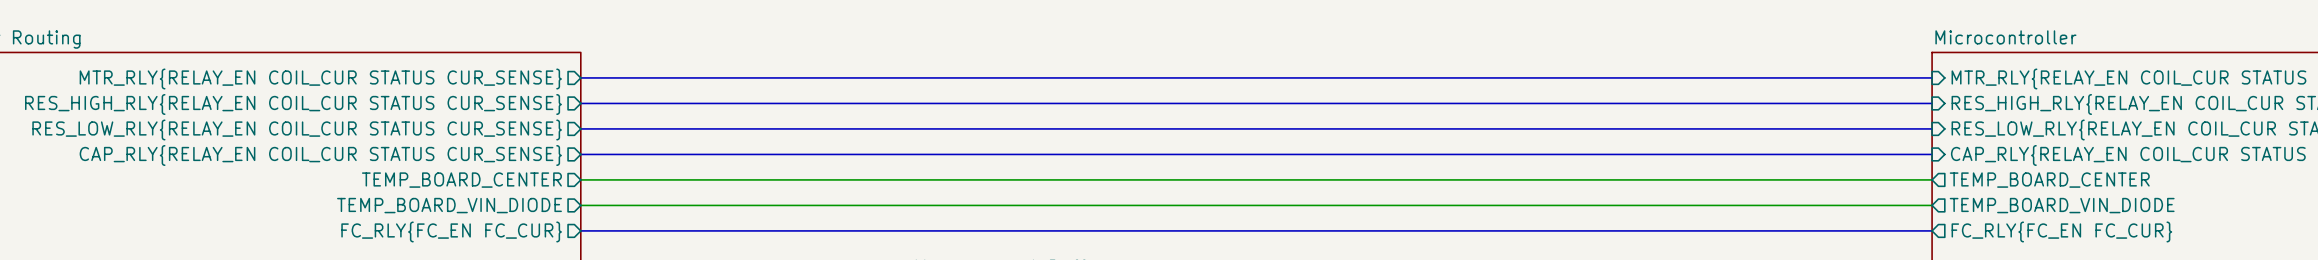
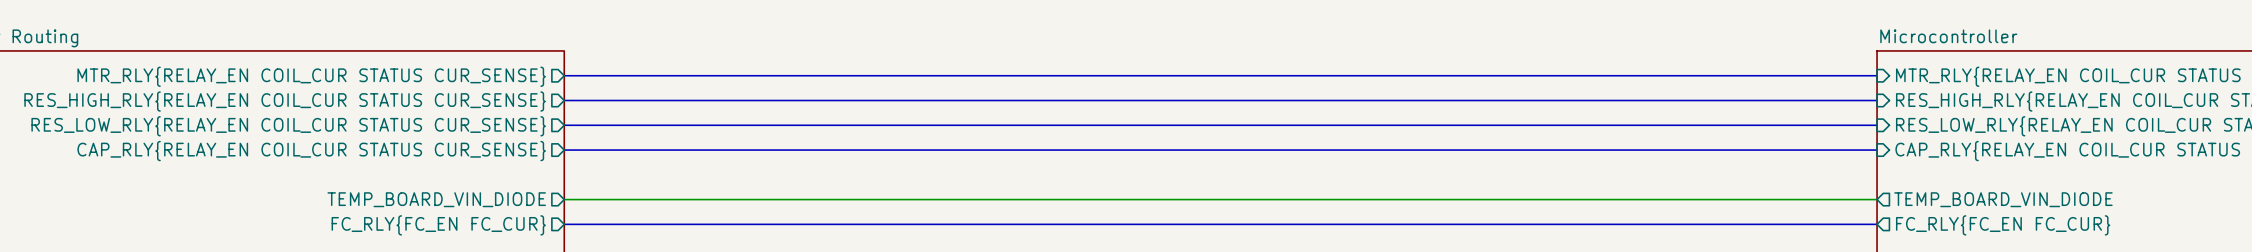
wire: (580, 179) (1932, 179) -> none
sheet pin: TEMP_BOARD_CENTER (461, 180) -> none
sheet pin: TEMP_BOARD_CENTER (2049, 180) -> none

